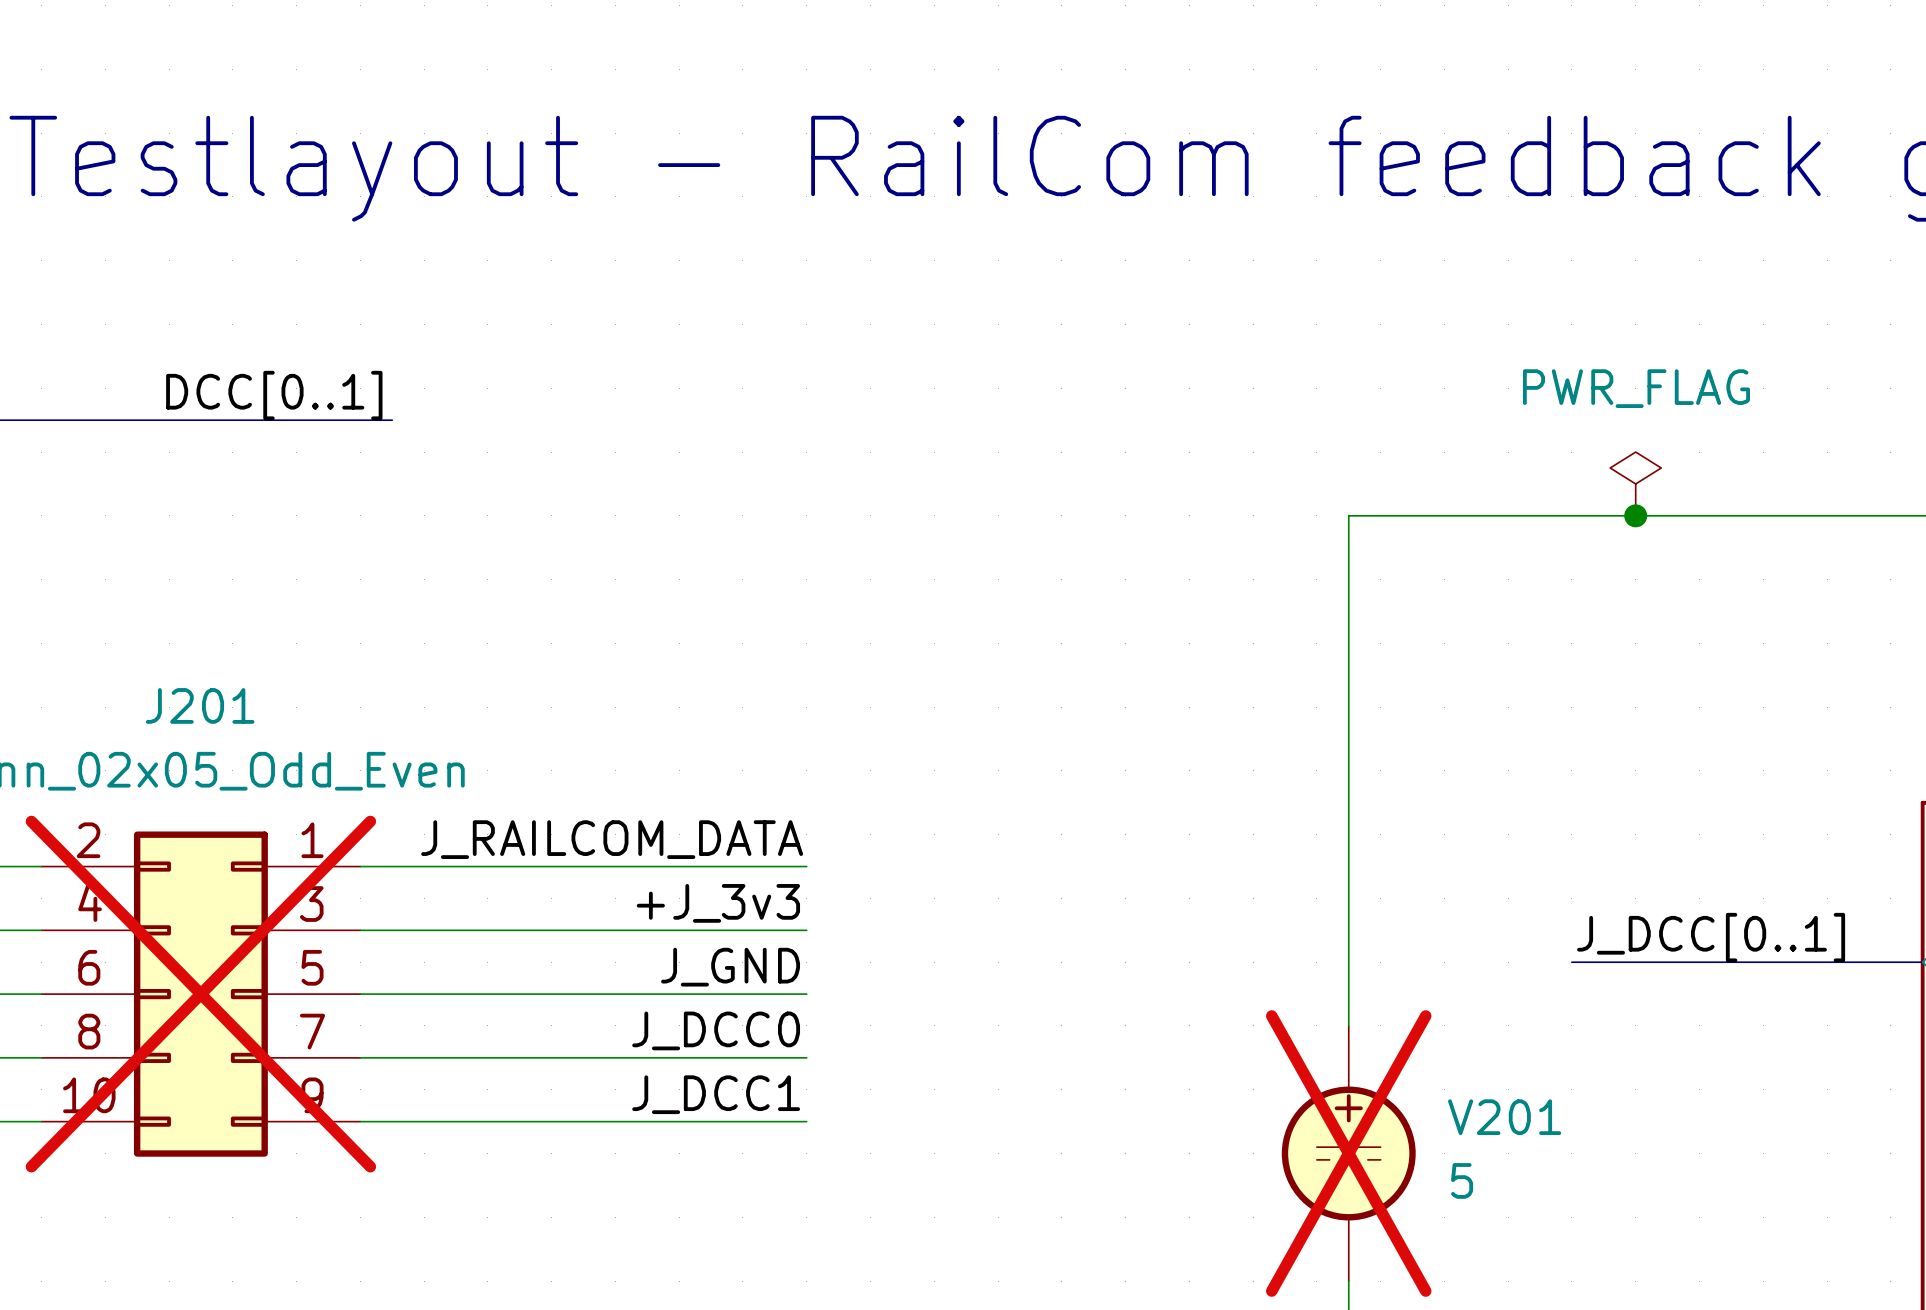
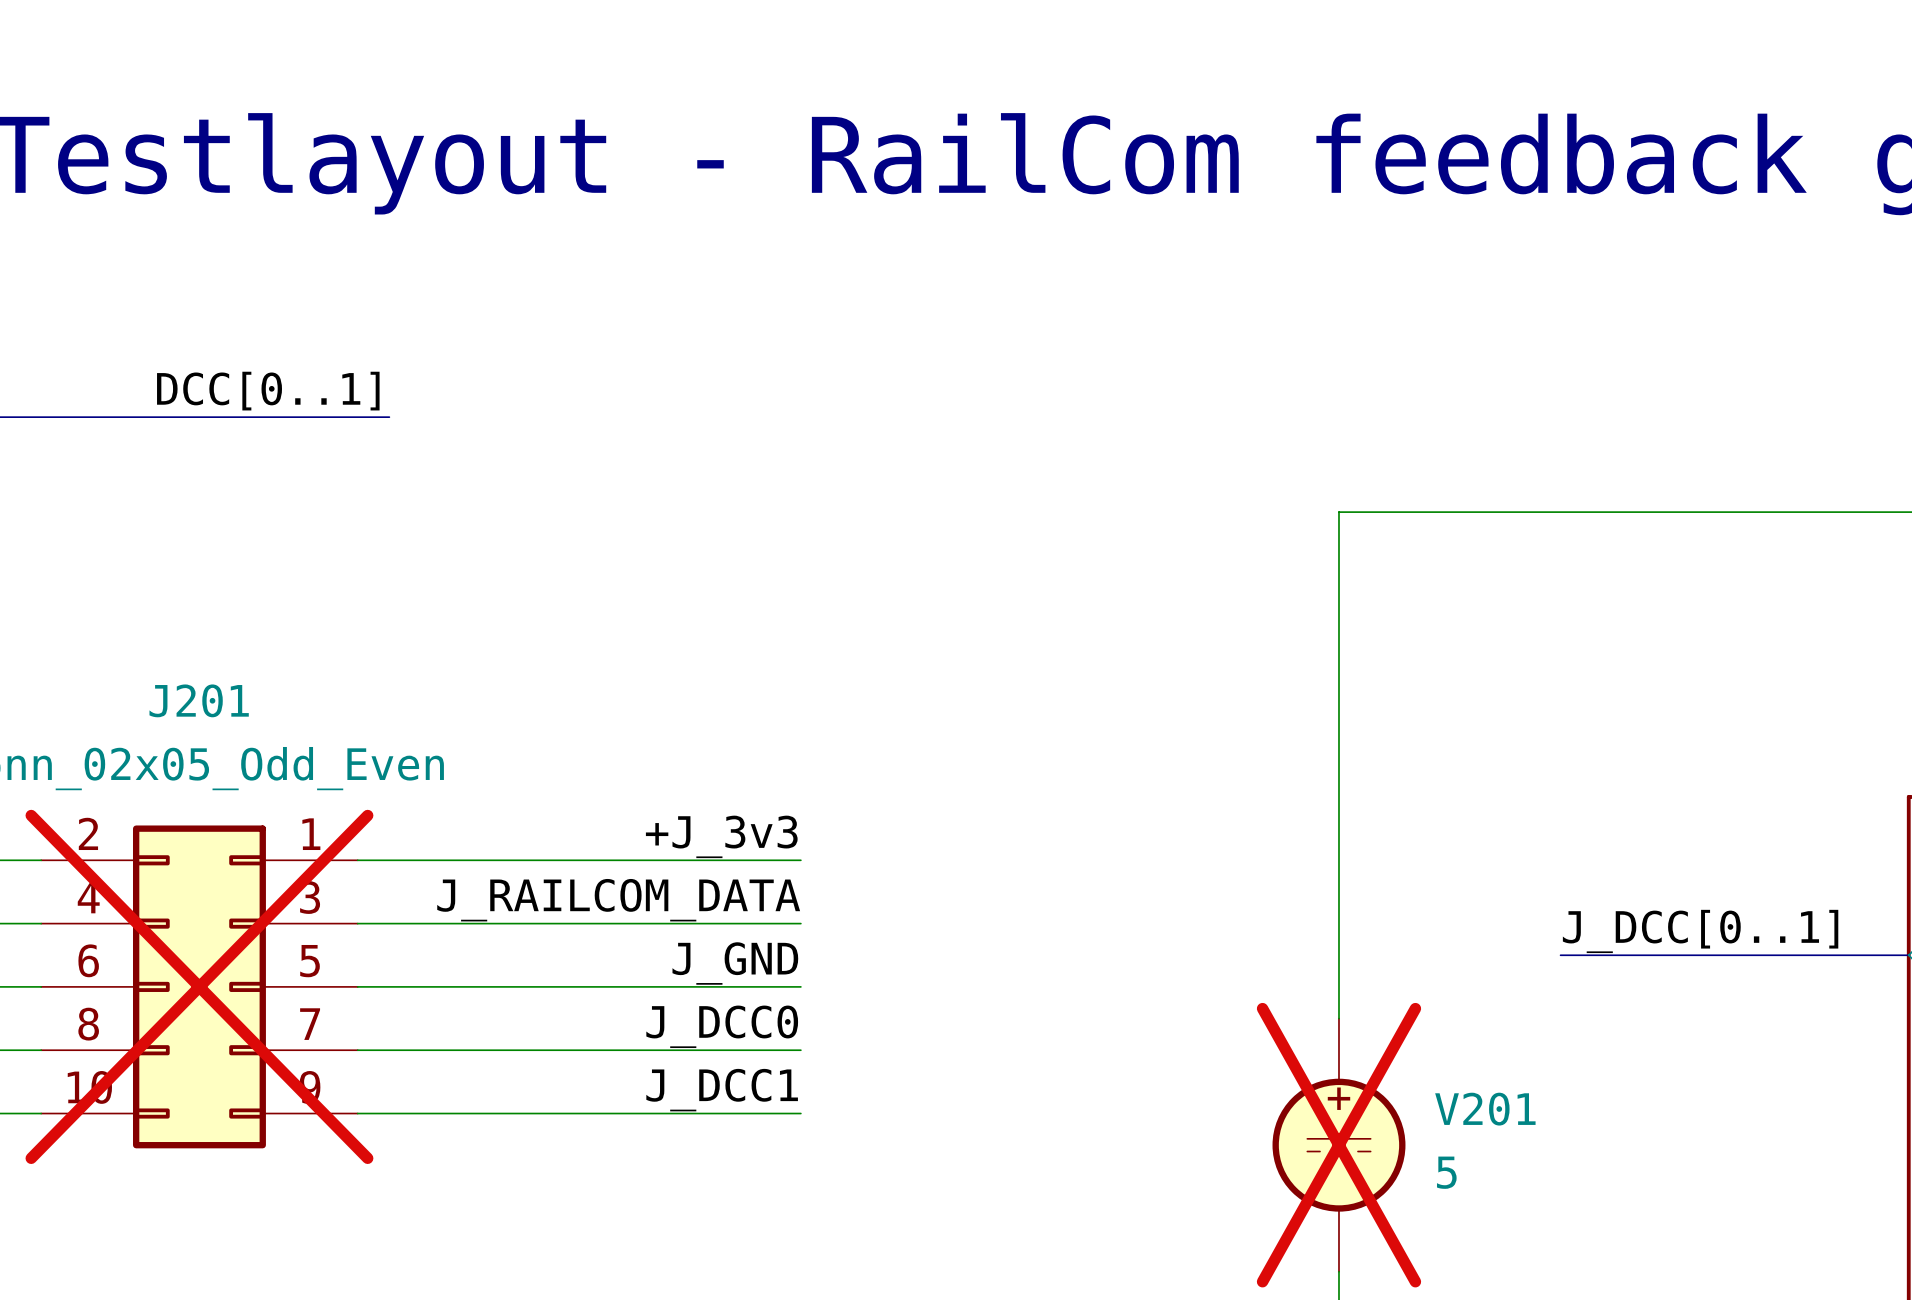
power symbol: PWR_FLAG (1635, 483) -> none
junction: (1635, 515) -> none
label: J_RAILCOM_DATA (612, 839) -> +J_3v3 (721, 836)
label: +J_3v3 (718, 903) -> J_RAILCOM_DATA (618, 900)

